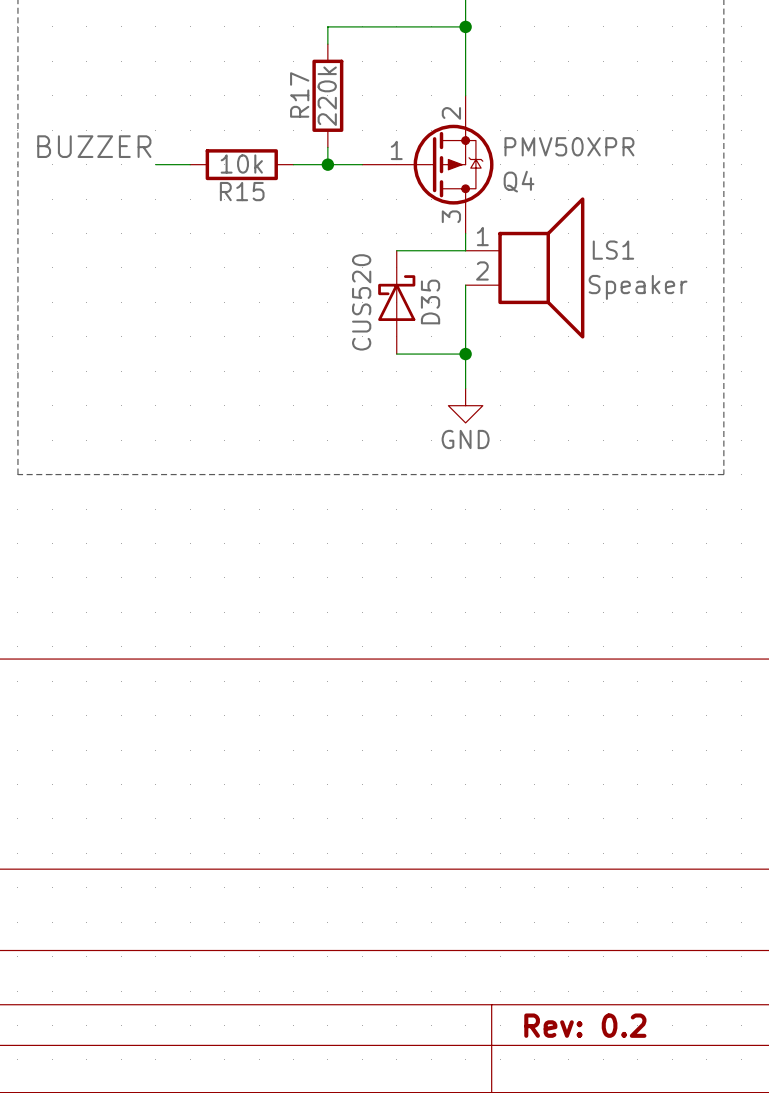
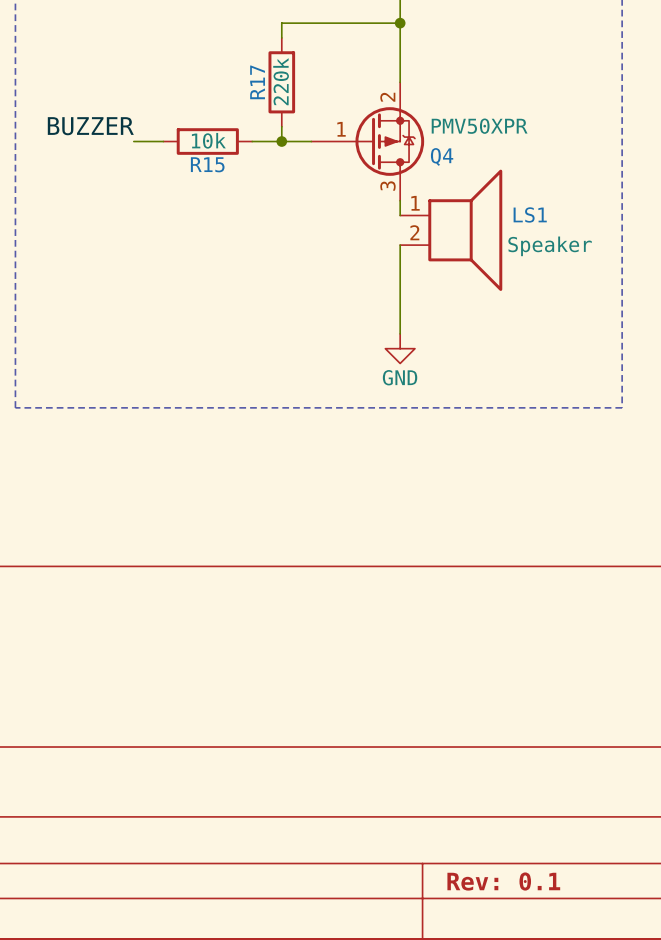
wire: (396, 250) (465, 250) -> none
D35: CUS520 (396, 302) -> none
wire: (396, 354) (465, 354) -> none
junction: (465, 354) -> none
title block: Rev: 0.2 (585, 1025) -> Rev: 0.1 (503, 881)

